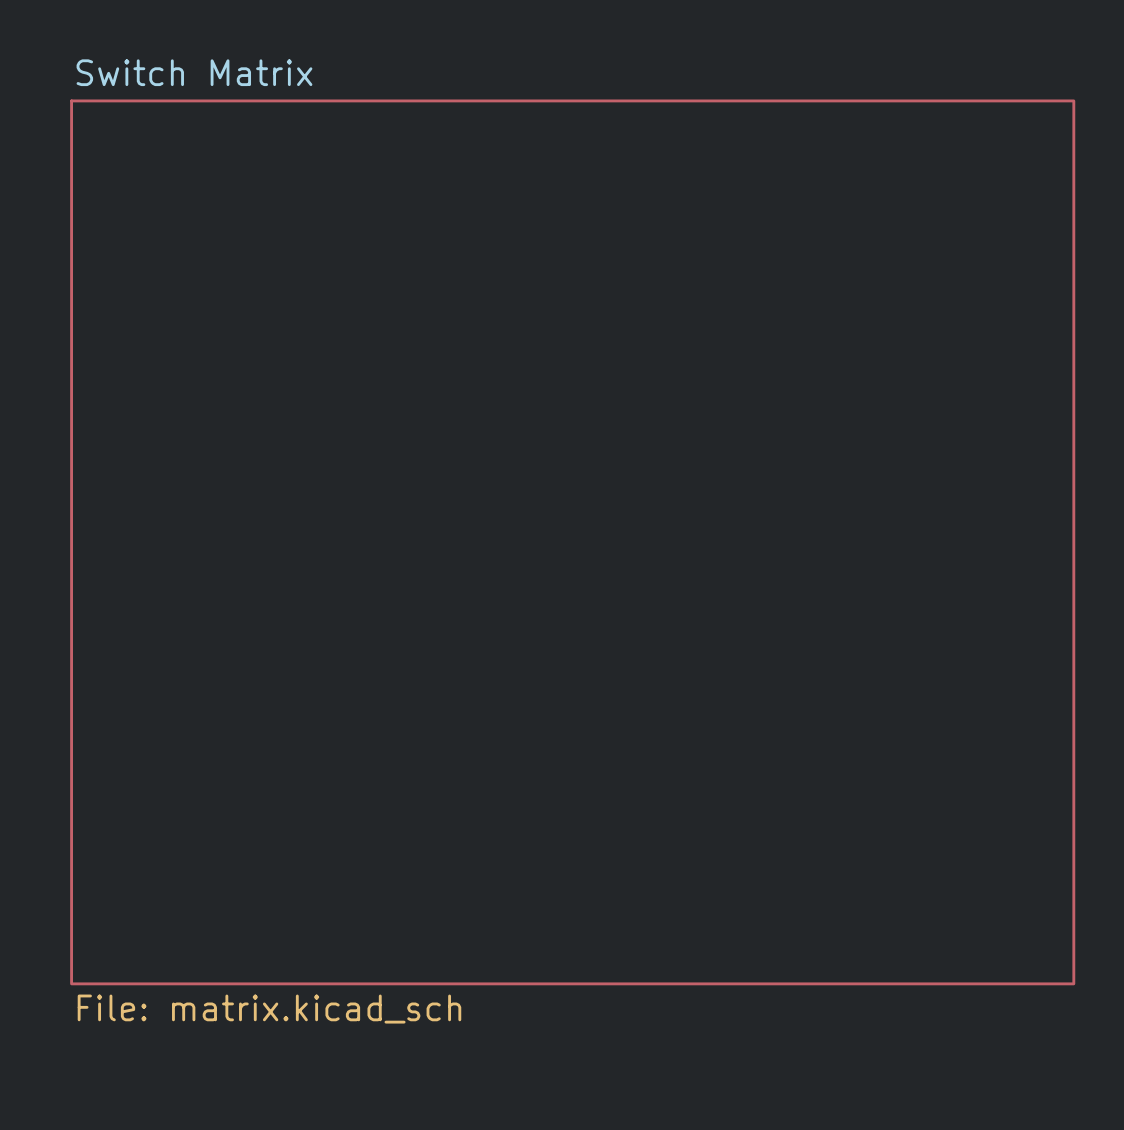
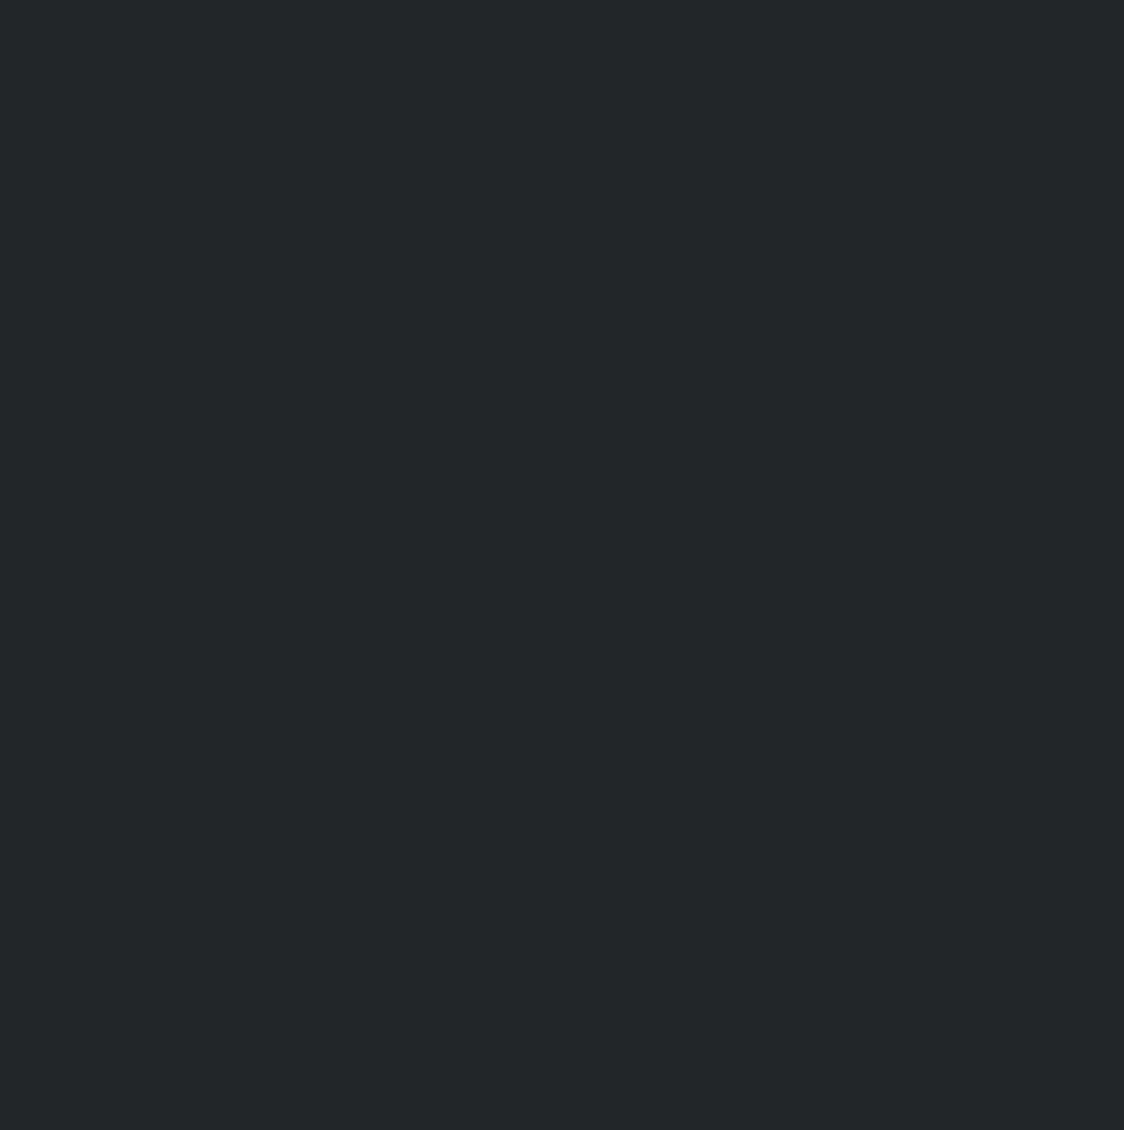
sheet Switch Matrix: File: matrix.kicad_sch (572, 542) -> none

